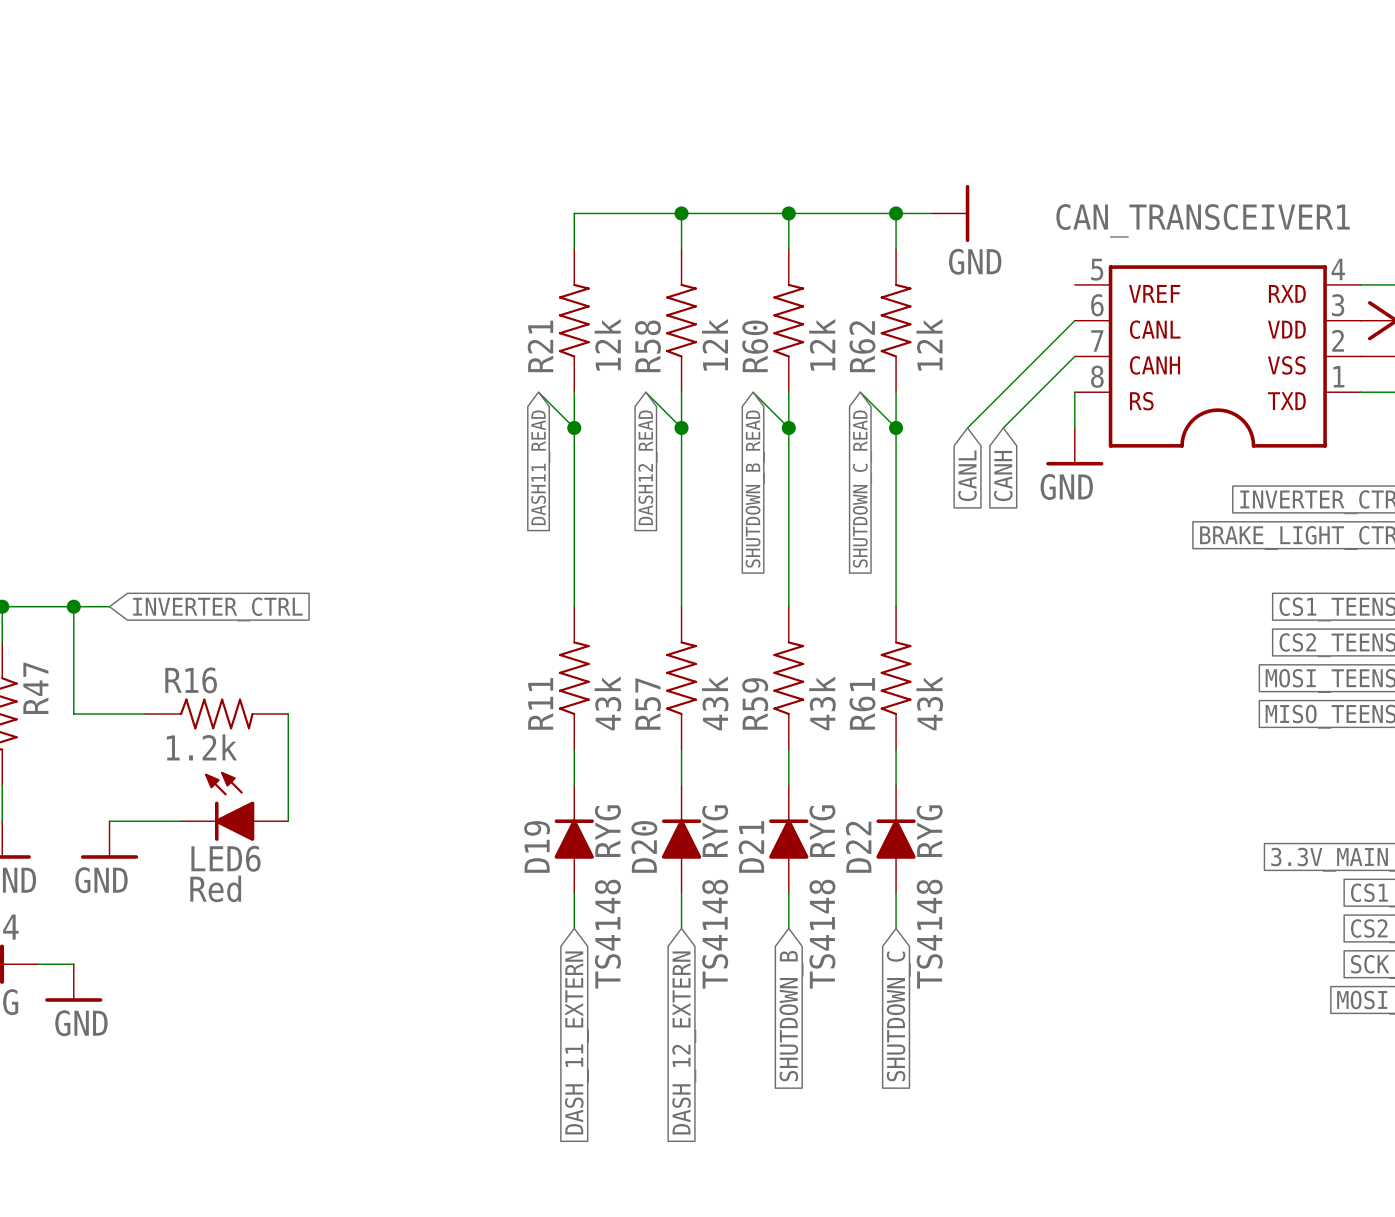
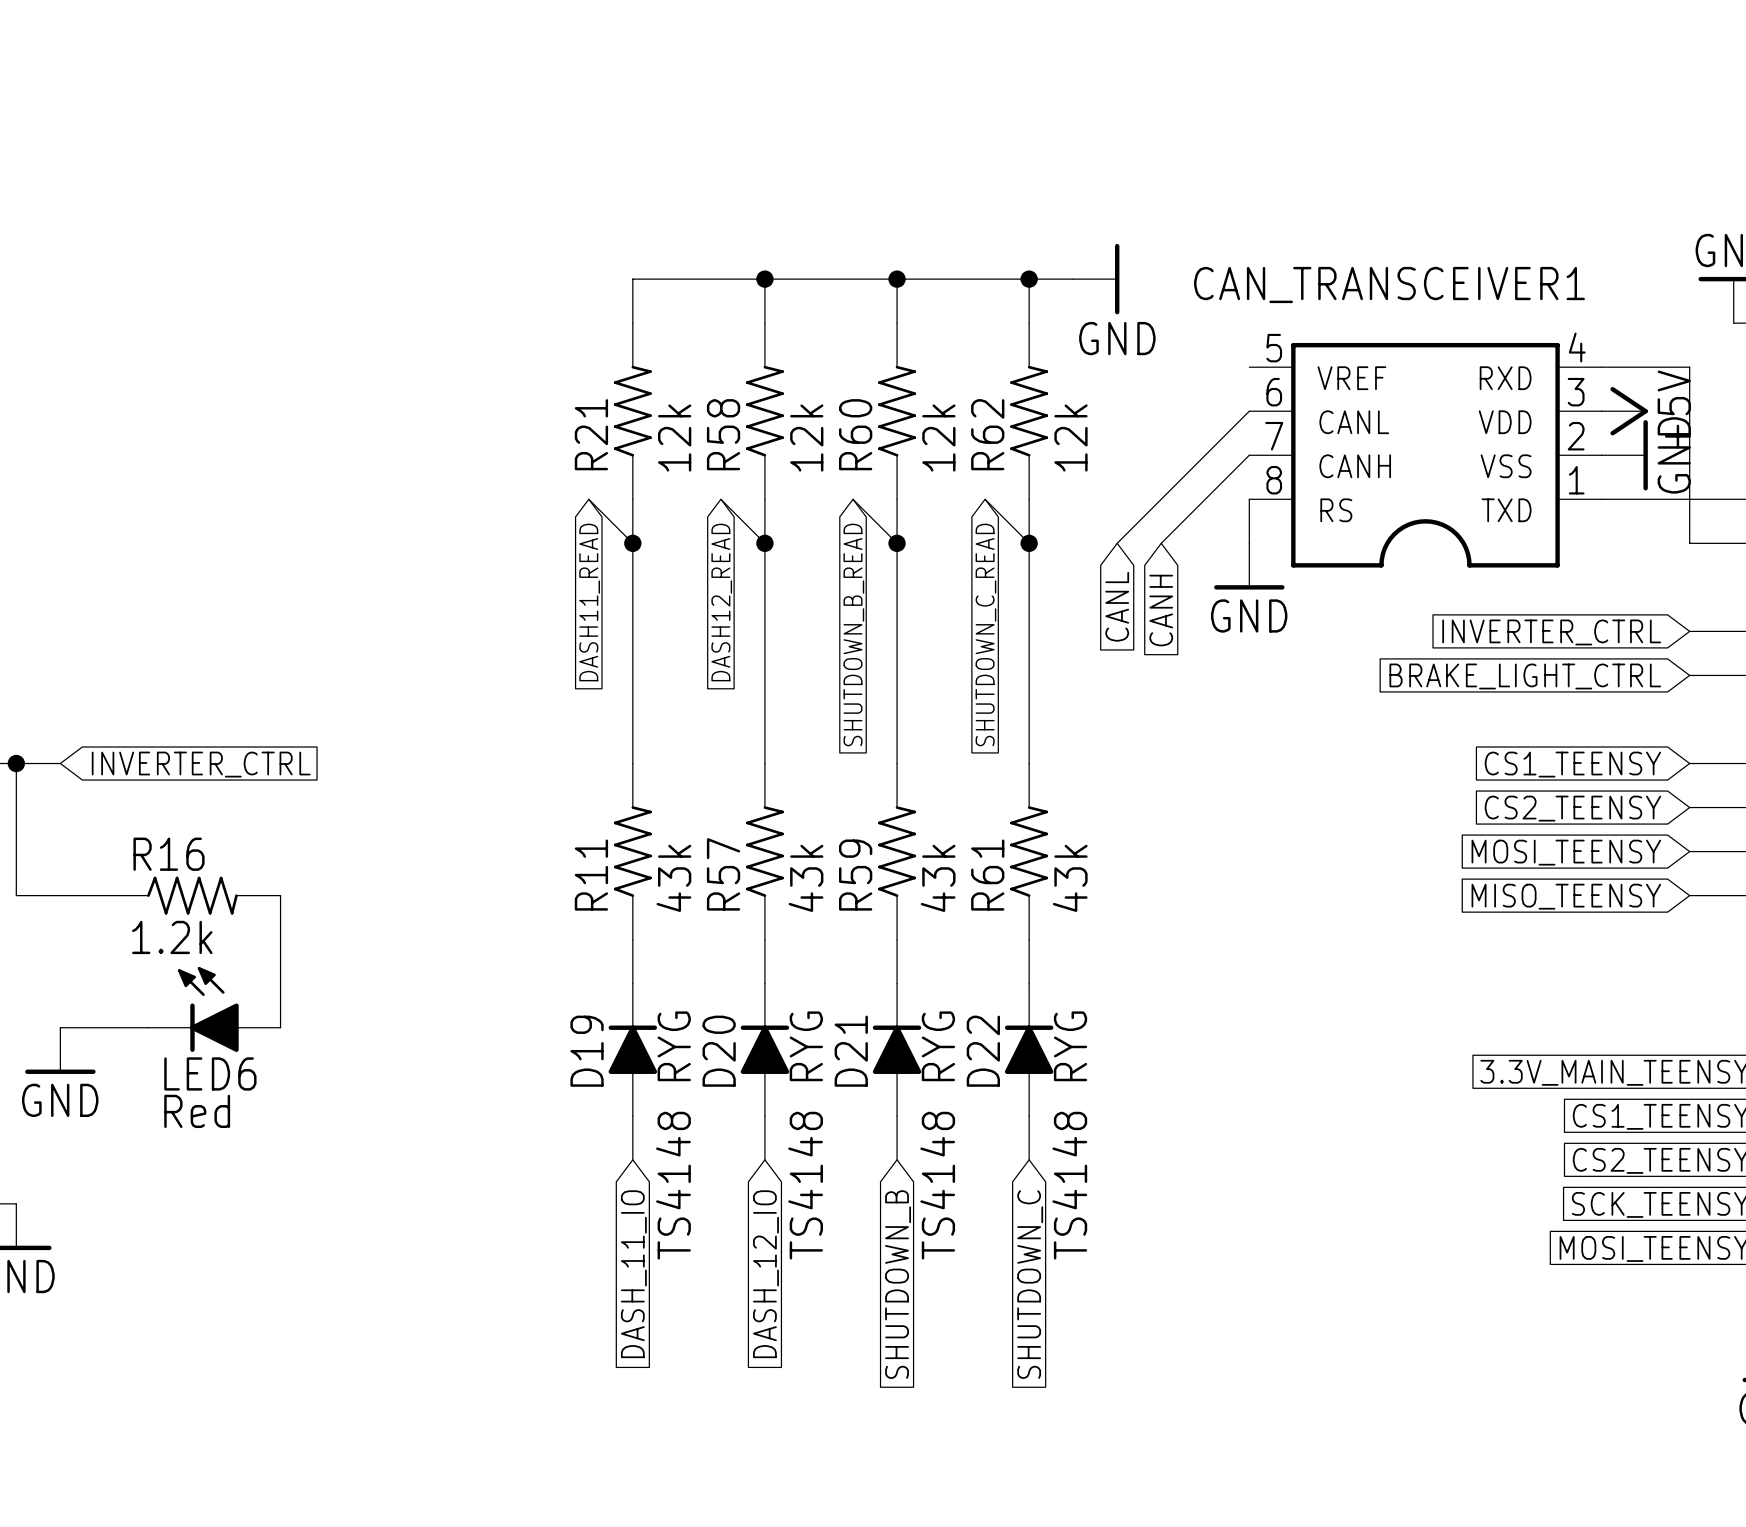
global label: DASH_11_EXTERN (577, 1042) -> DASH_11_IO (633, 1274)
global label: DASH_12_EXTERN (684, 1042) -> DASH_12_IO (765, 1274)

